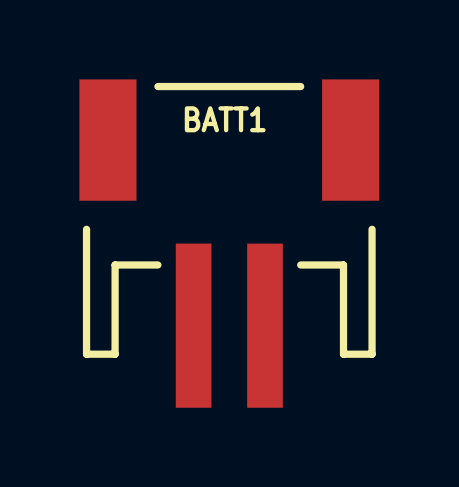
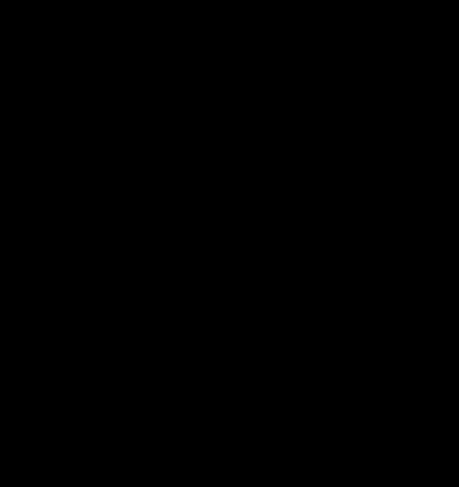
BATT1: (229, 243) -> none

